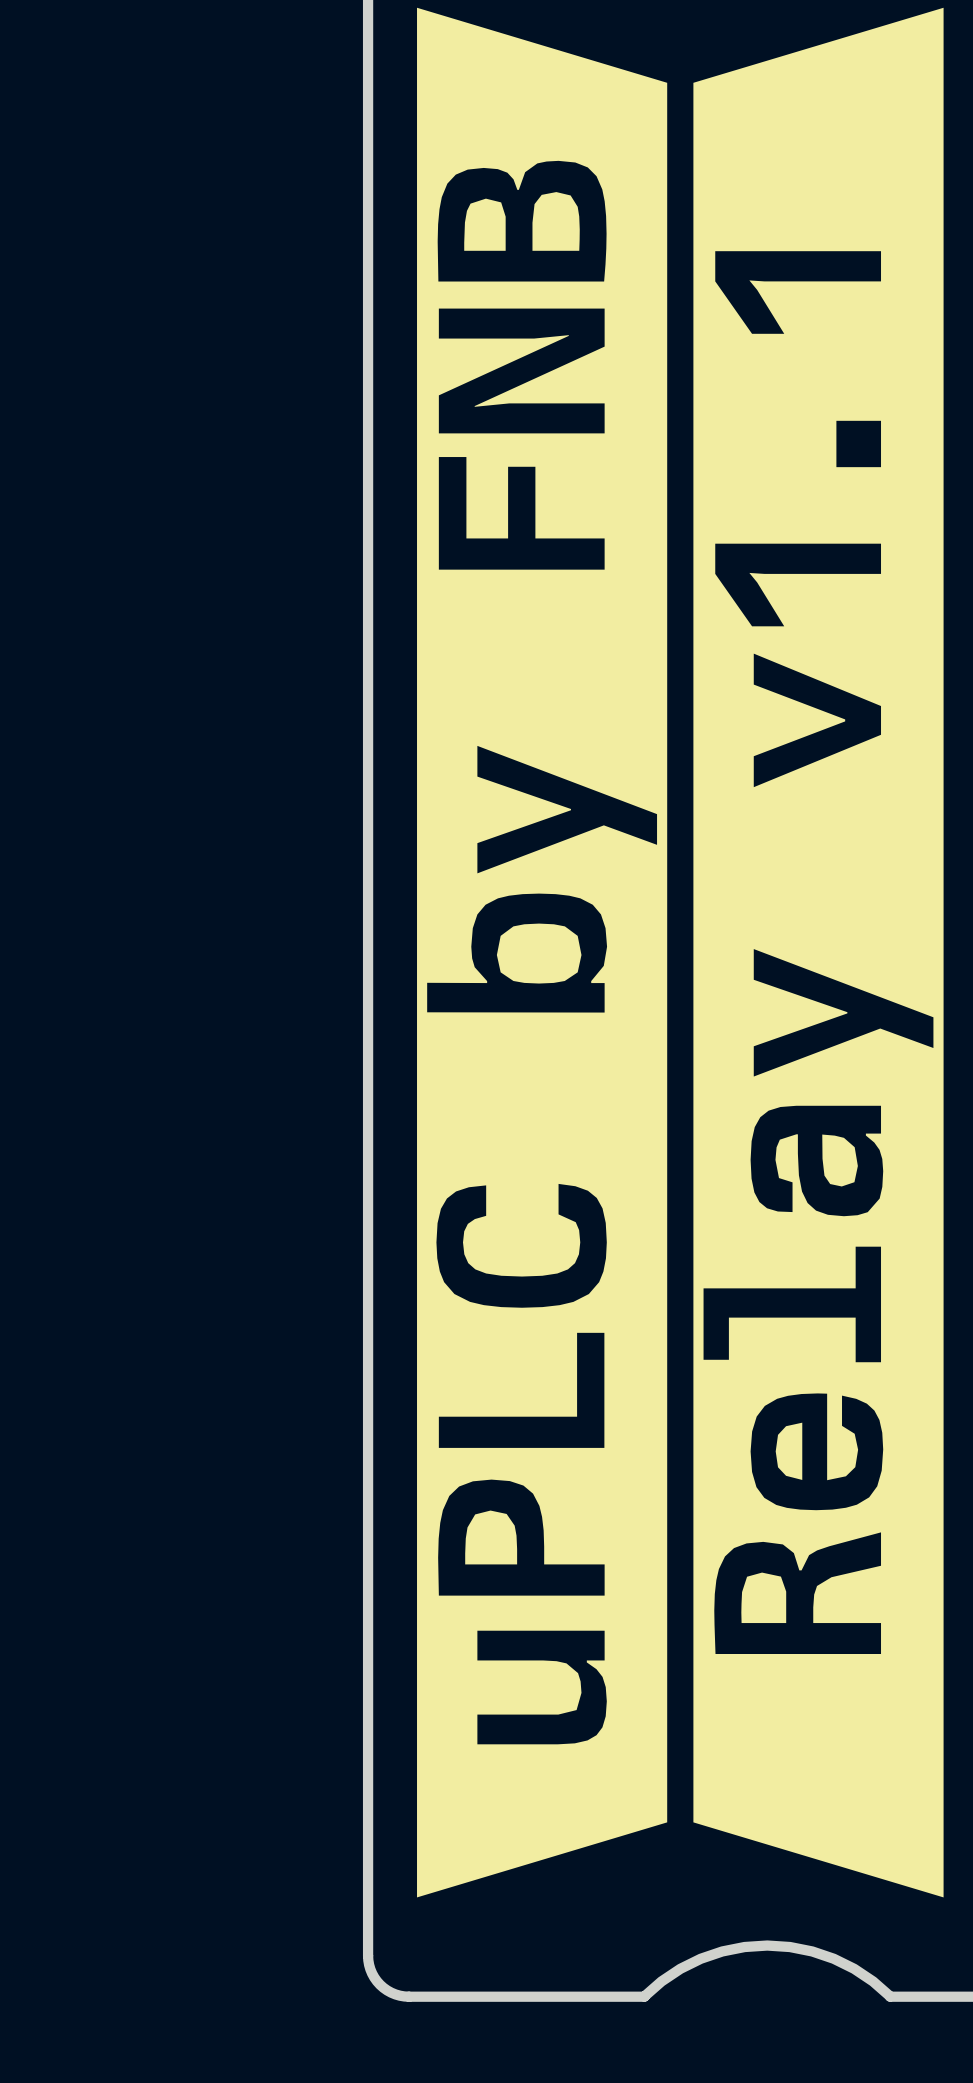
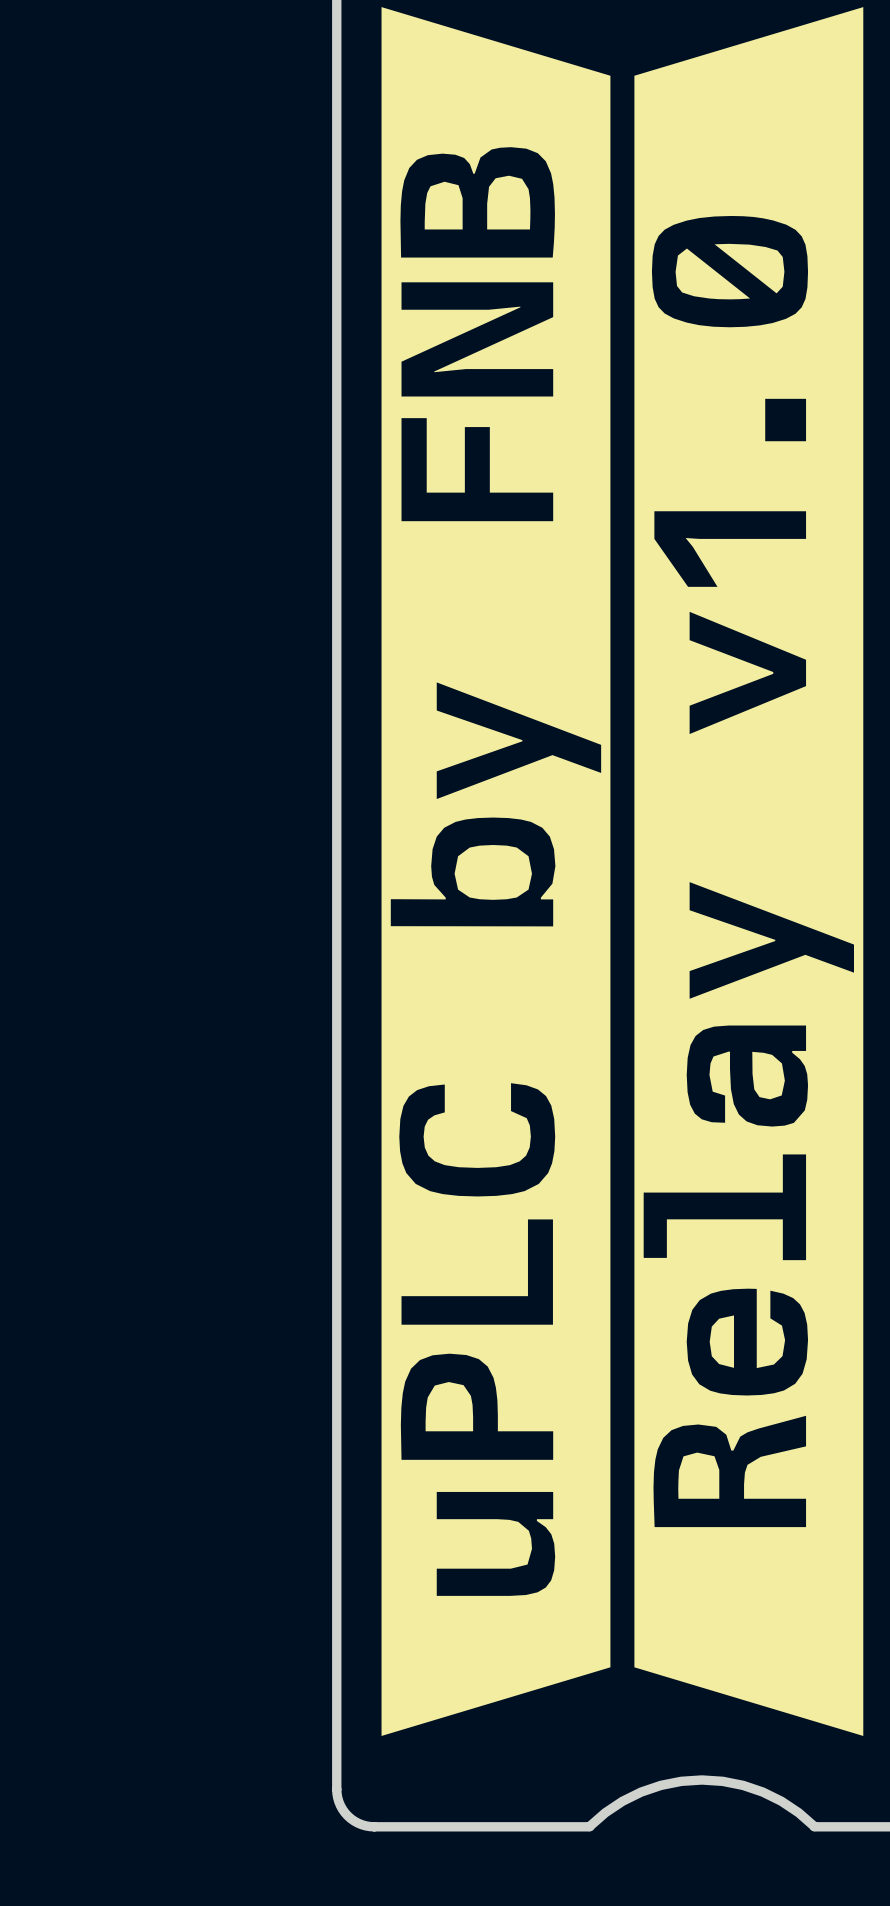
drawing shape: [693, 7, 944, 1898] -> [634, 7, 864, 1736]

